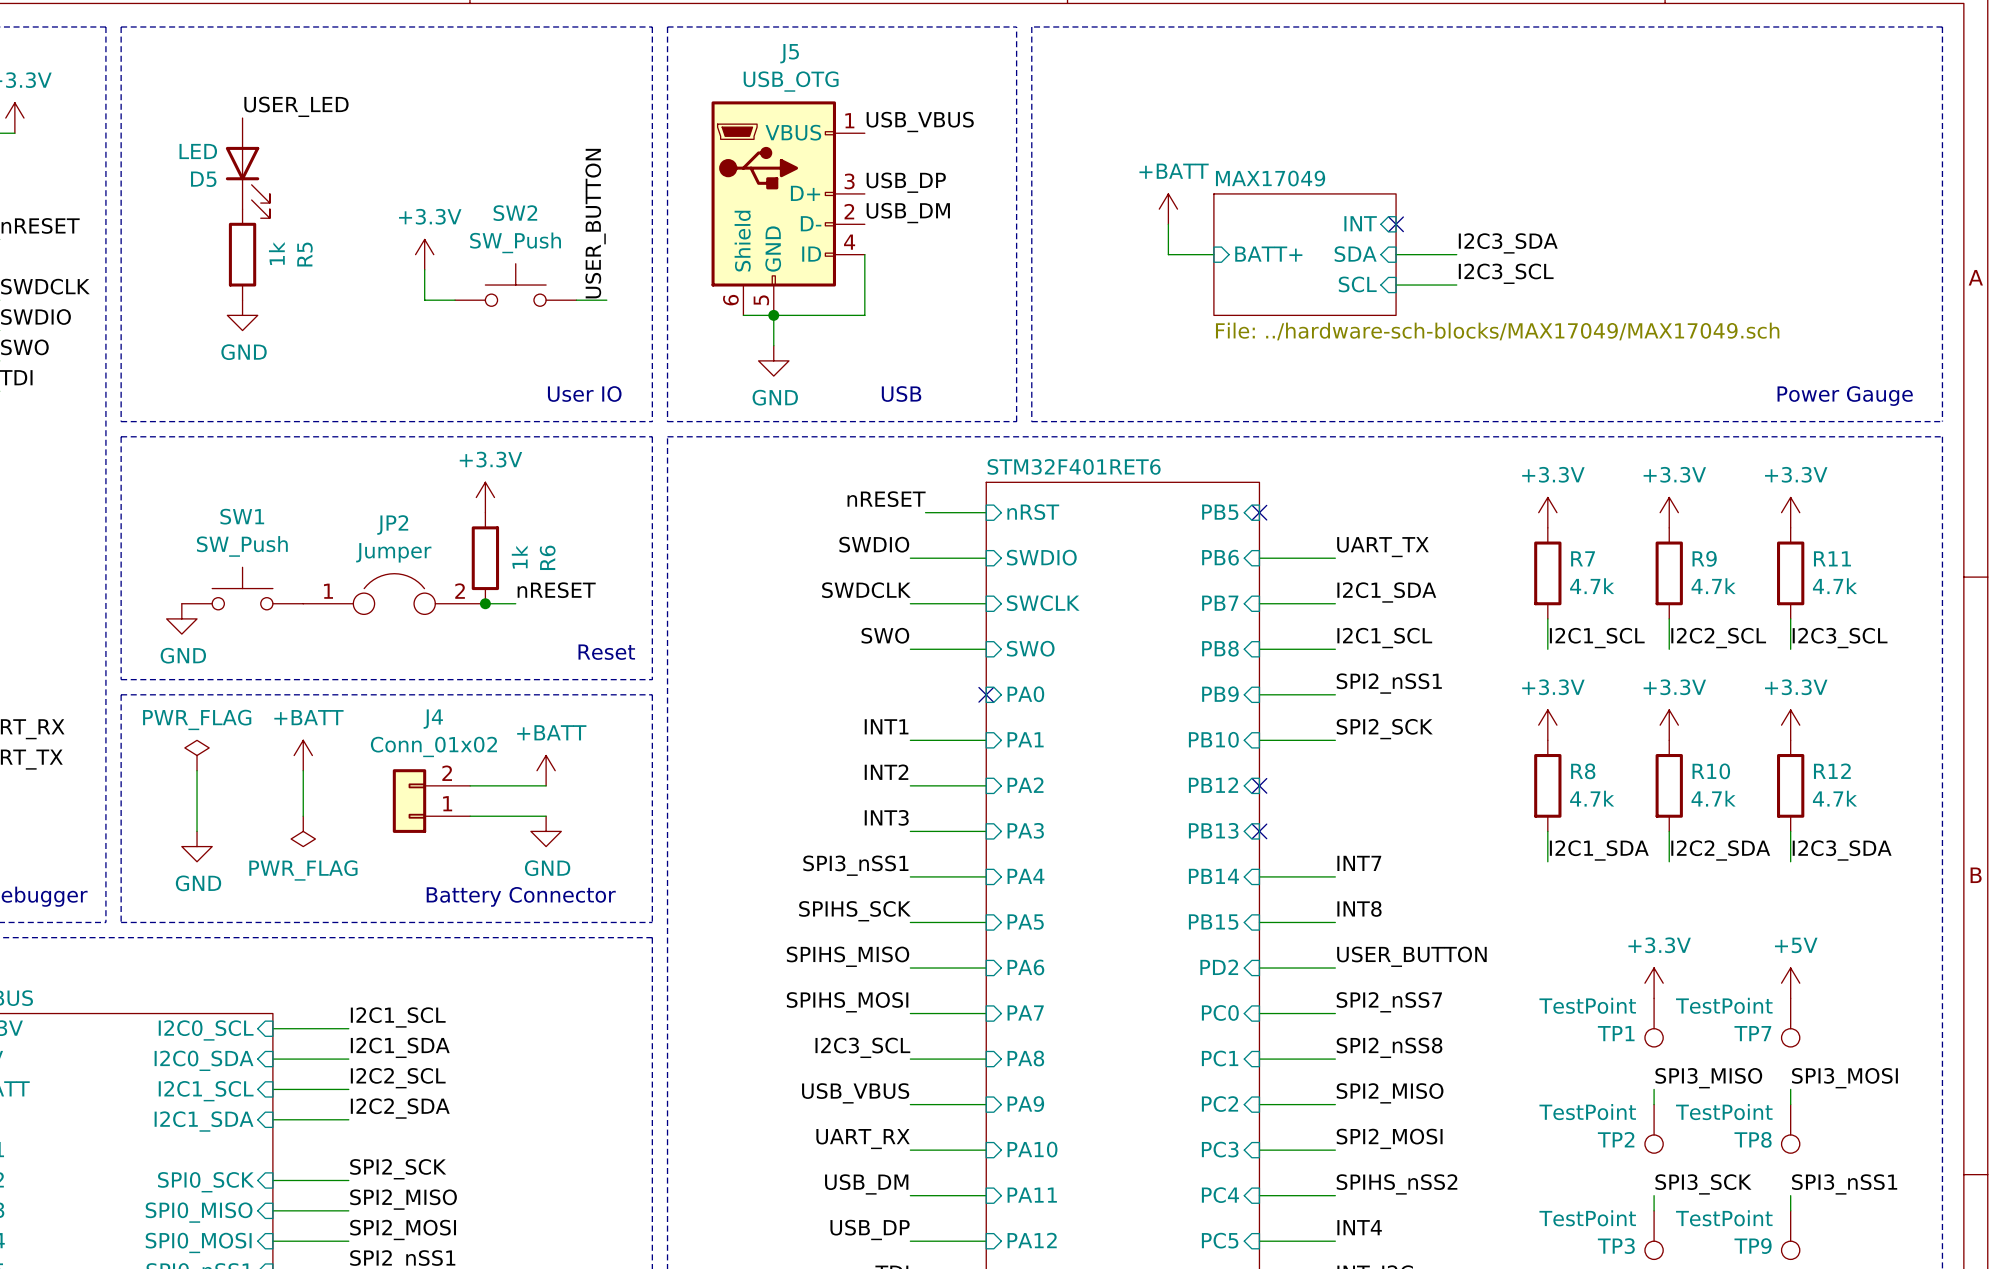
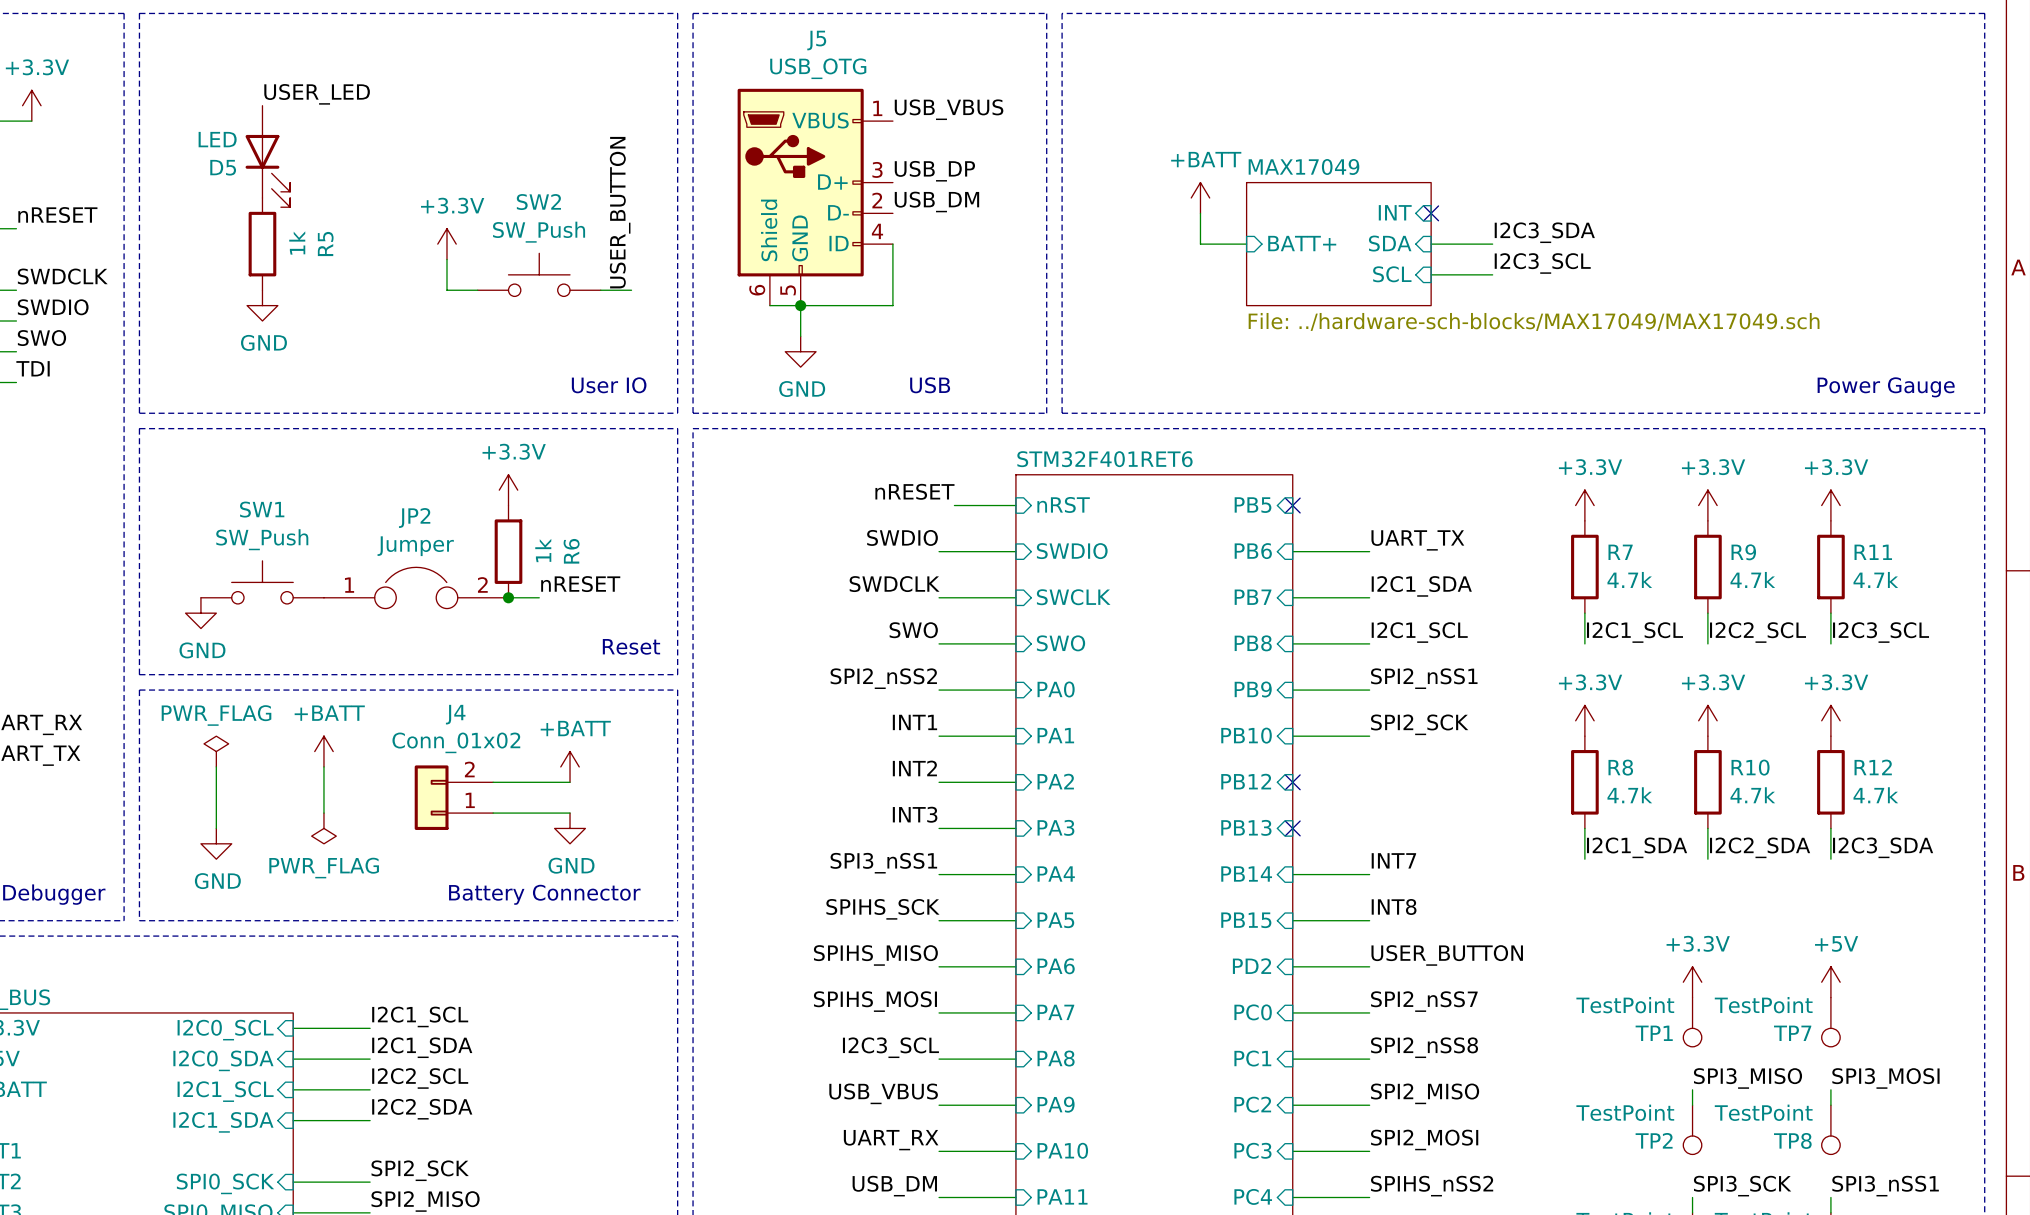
label: none -> SPI2_nSS2 (883, 678)
wire: none -> (939, 690) (1015, 690)
no-connect mark: (986, 694) -> none

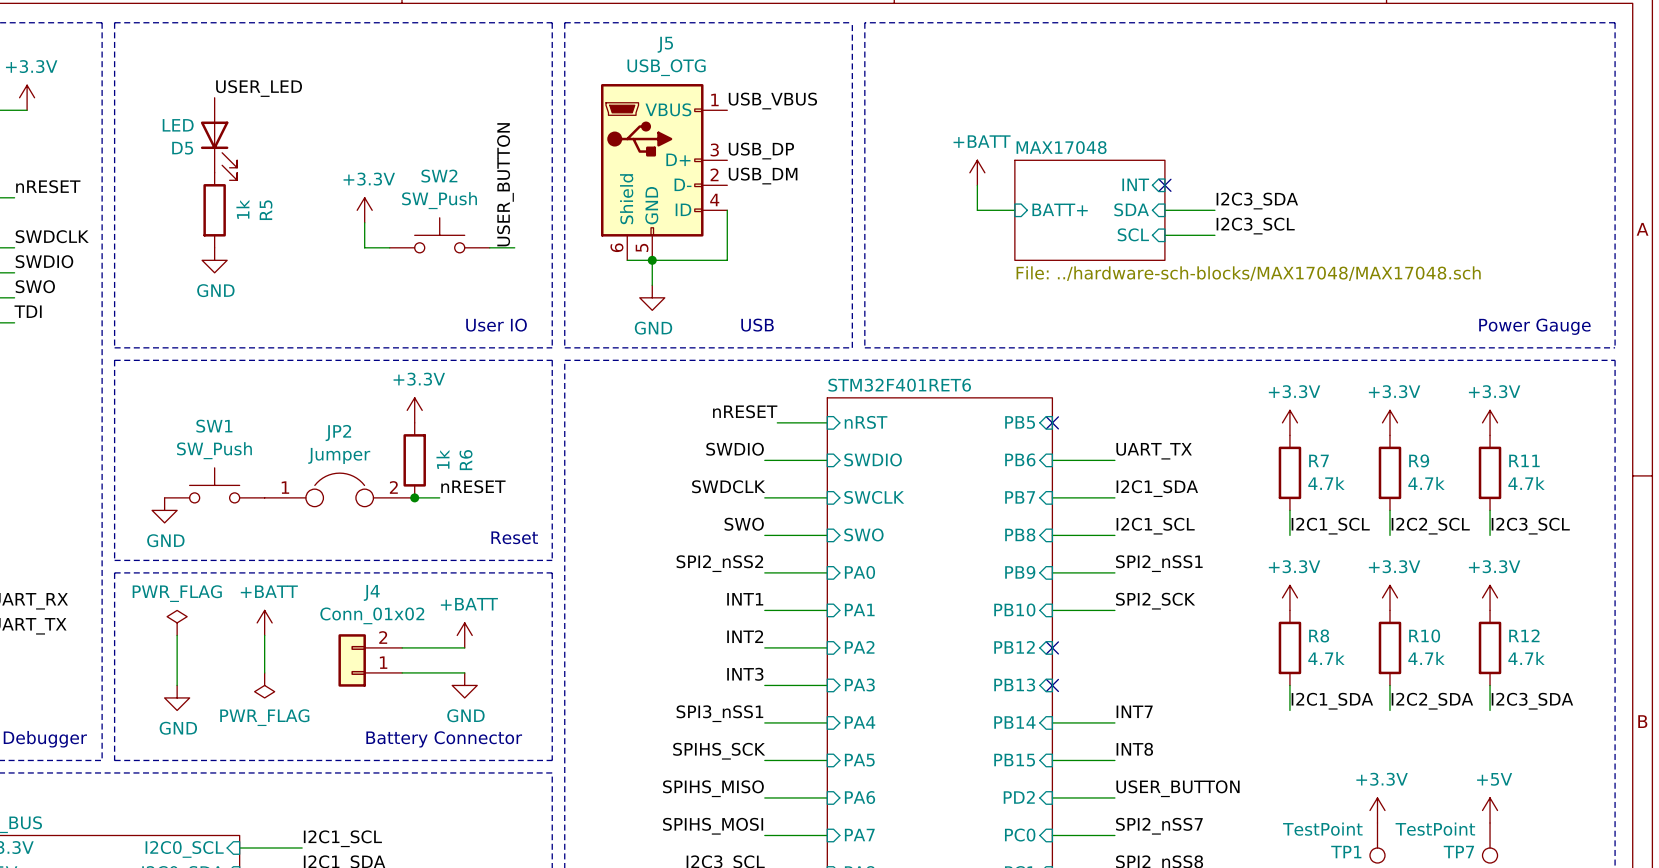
sheet MAX17049 name: MAX17049 (1303, 166) -> MAX17048 (1061, 147)
sheet MAX17049 value: File: ../hardware-sch-blocks/MAX17049/MAX17049.sch (1534, 321) -> File: ../hardware-sch-blocks/MAX17048/MAX17048.sch (1248, 273)

